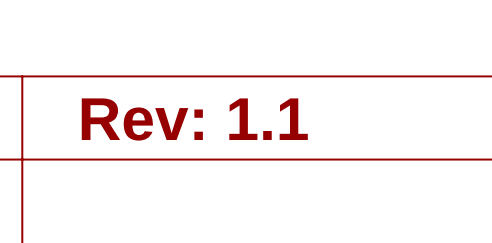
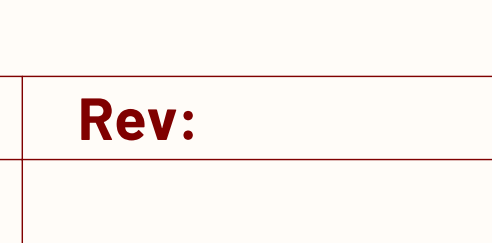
title block: Rev: 1.1 (194, 119) -> Rev: (137, 119)

